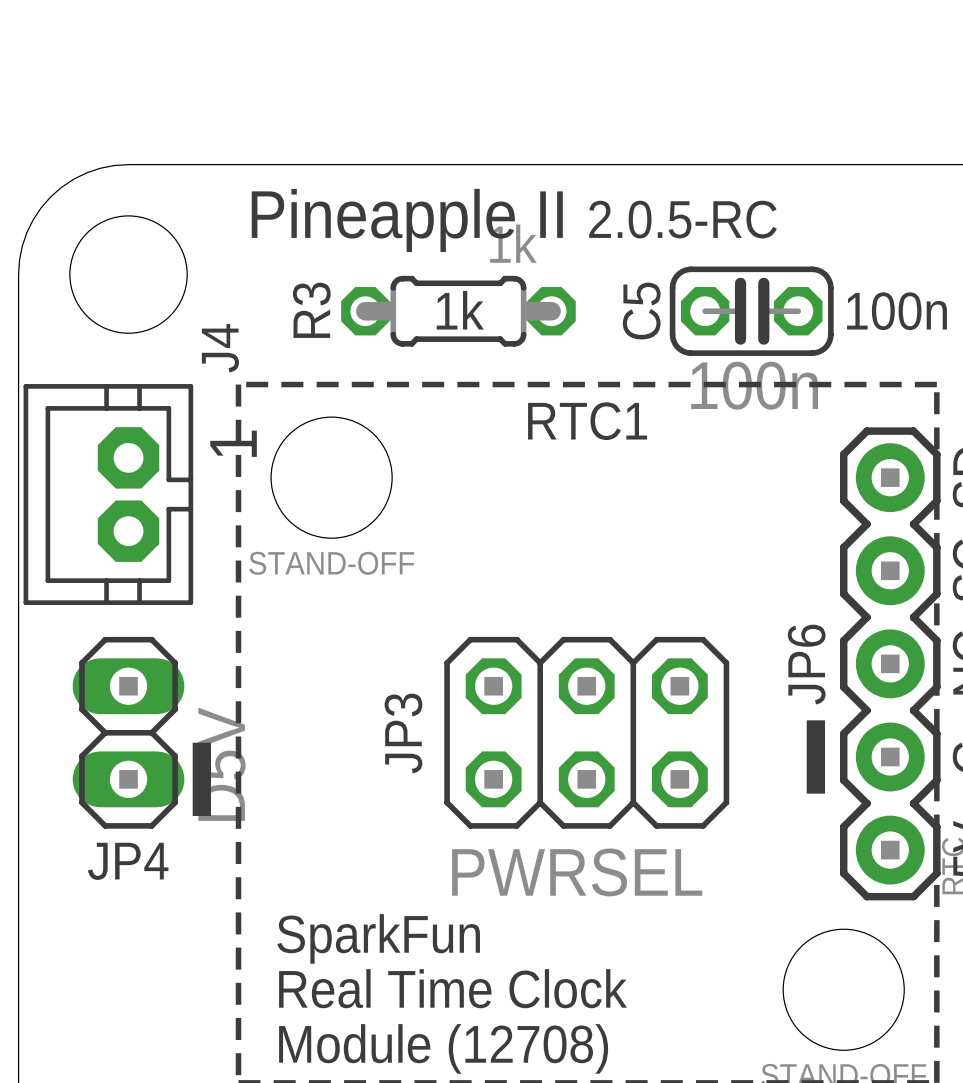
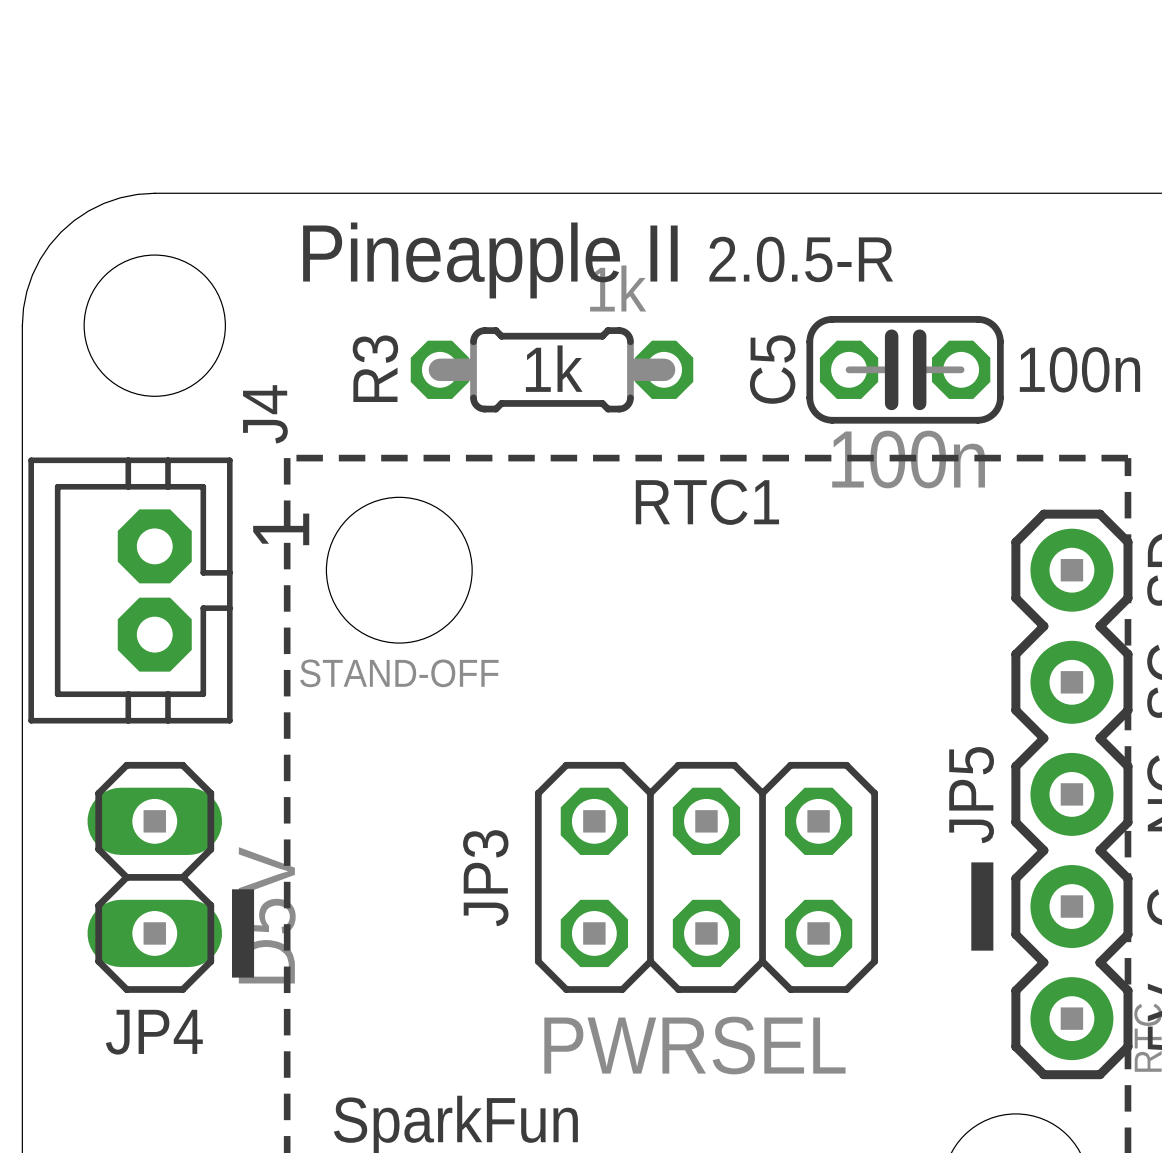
text: 2.0.5-RC (682, 219) -> 2.0.5-R (801, 259)
JP6 name: JP6 (806, 664) -> JP5 (971, 795)

